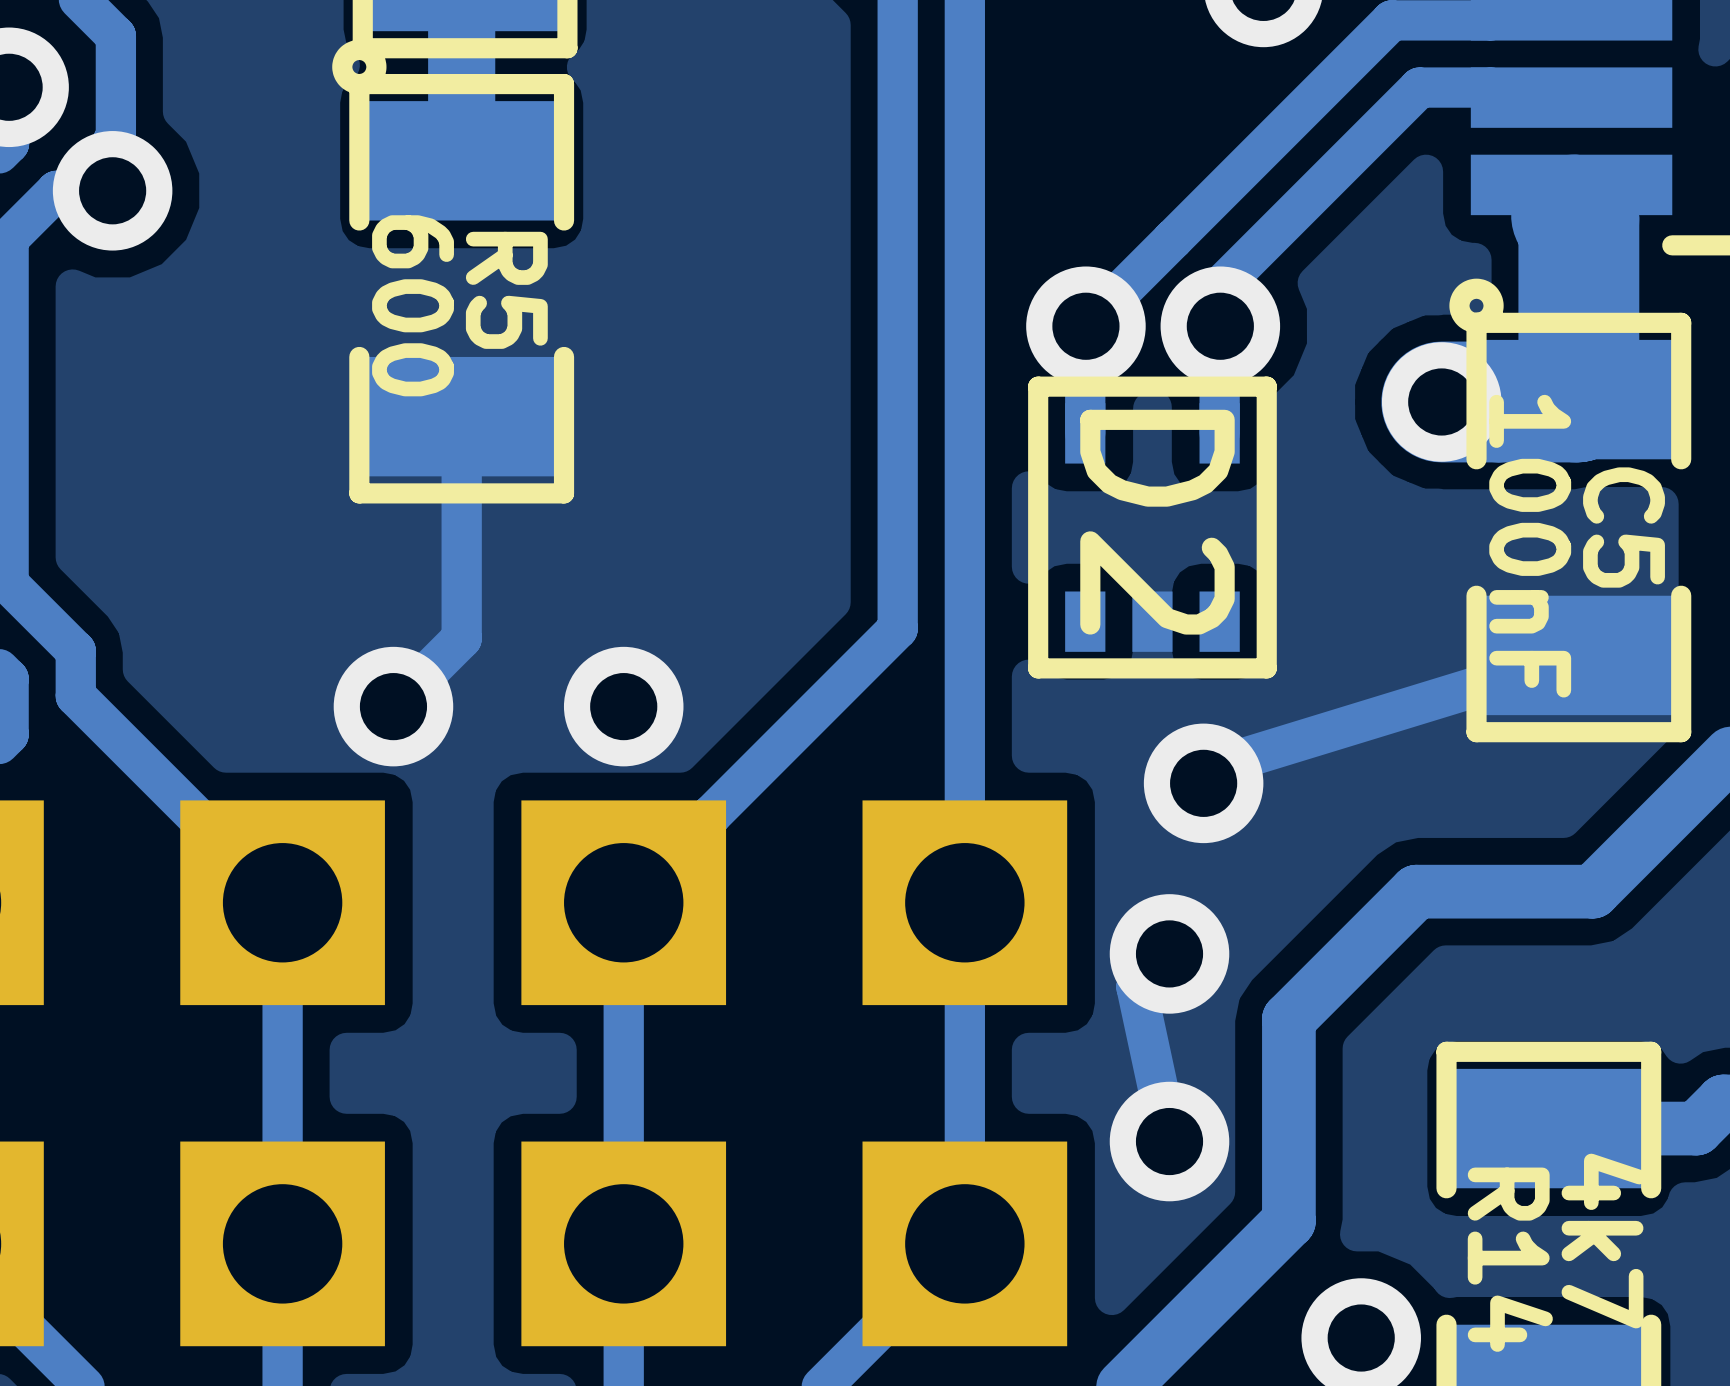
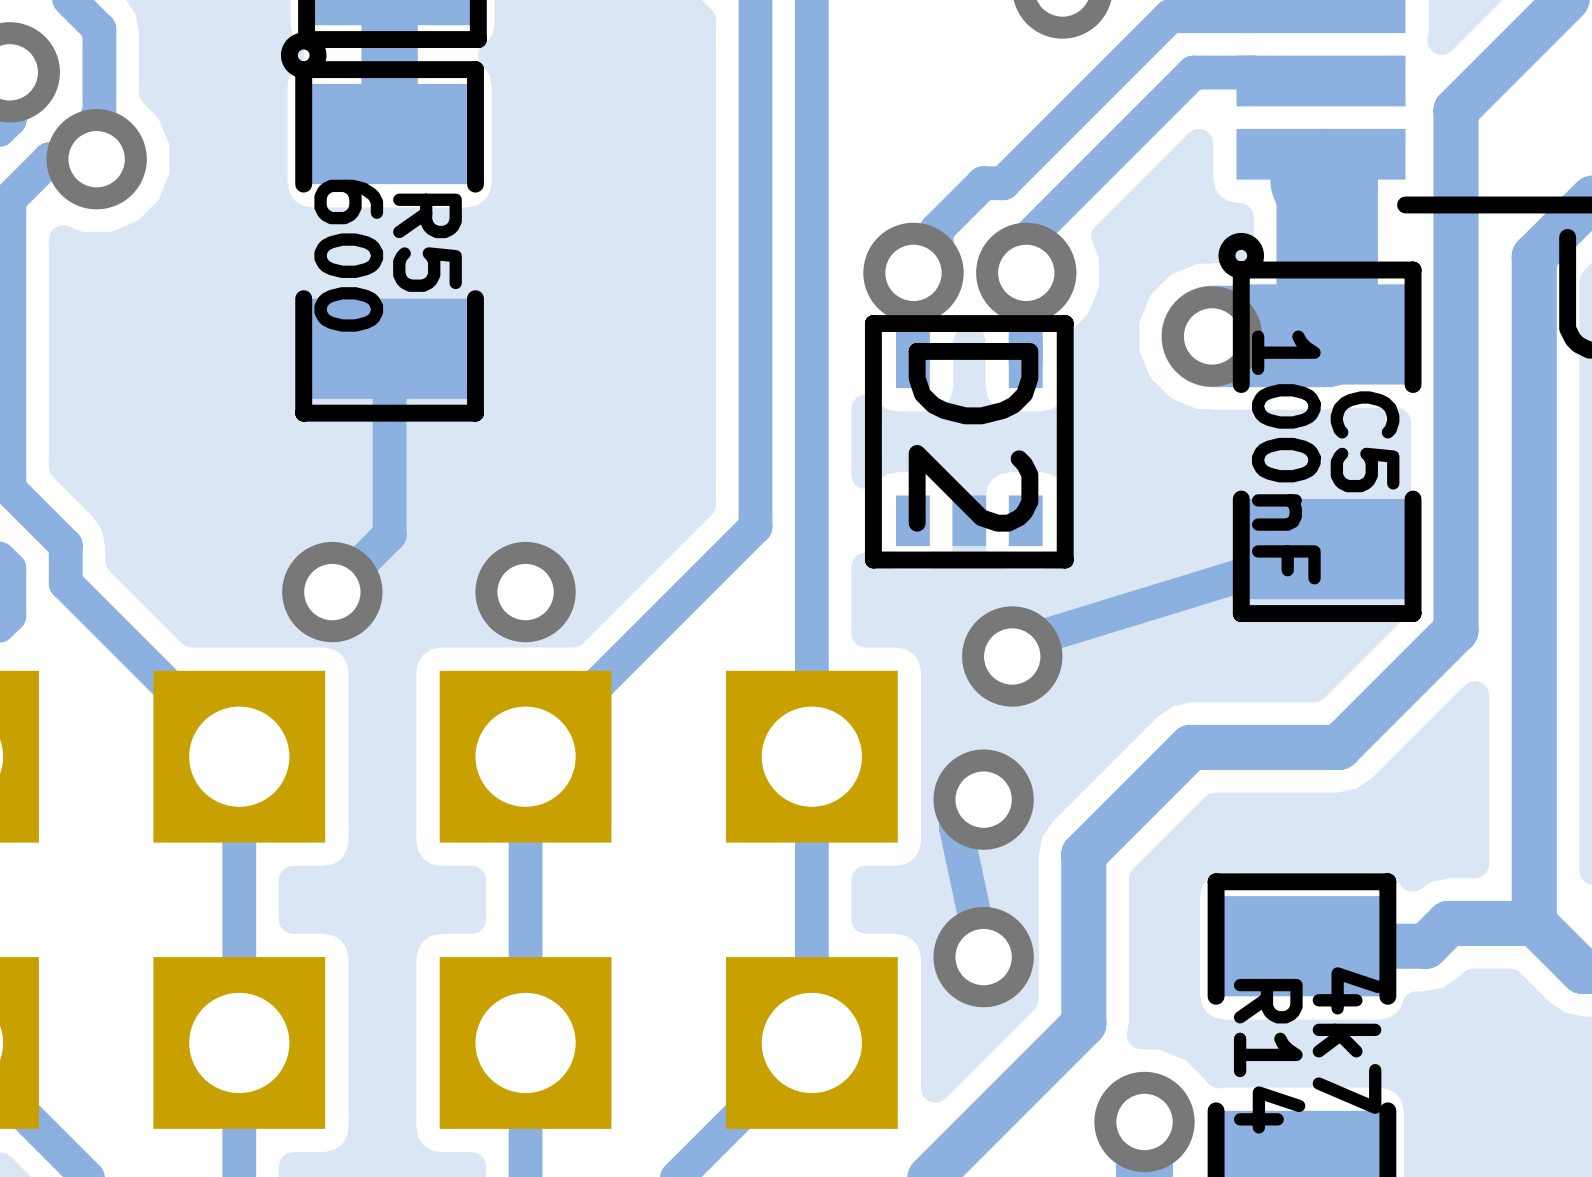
track: (1192, 219) (1113, 298) -> (1003, 183) (983, 183) (936, 229) (936, 249)

